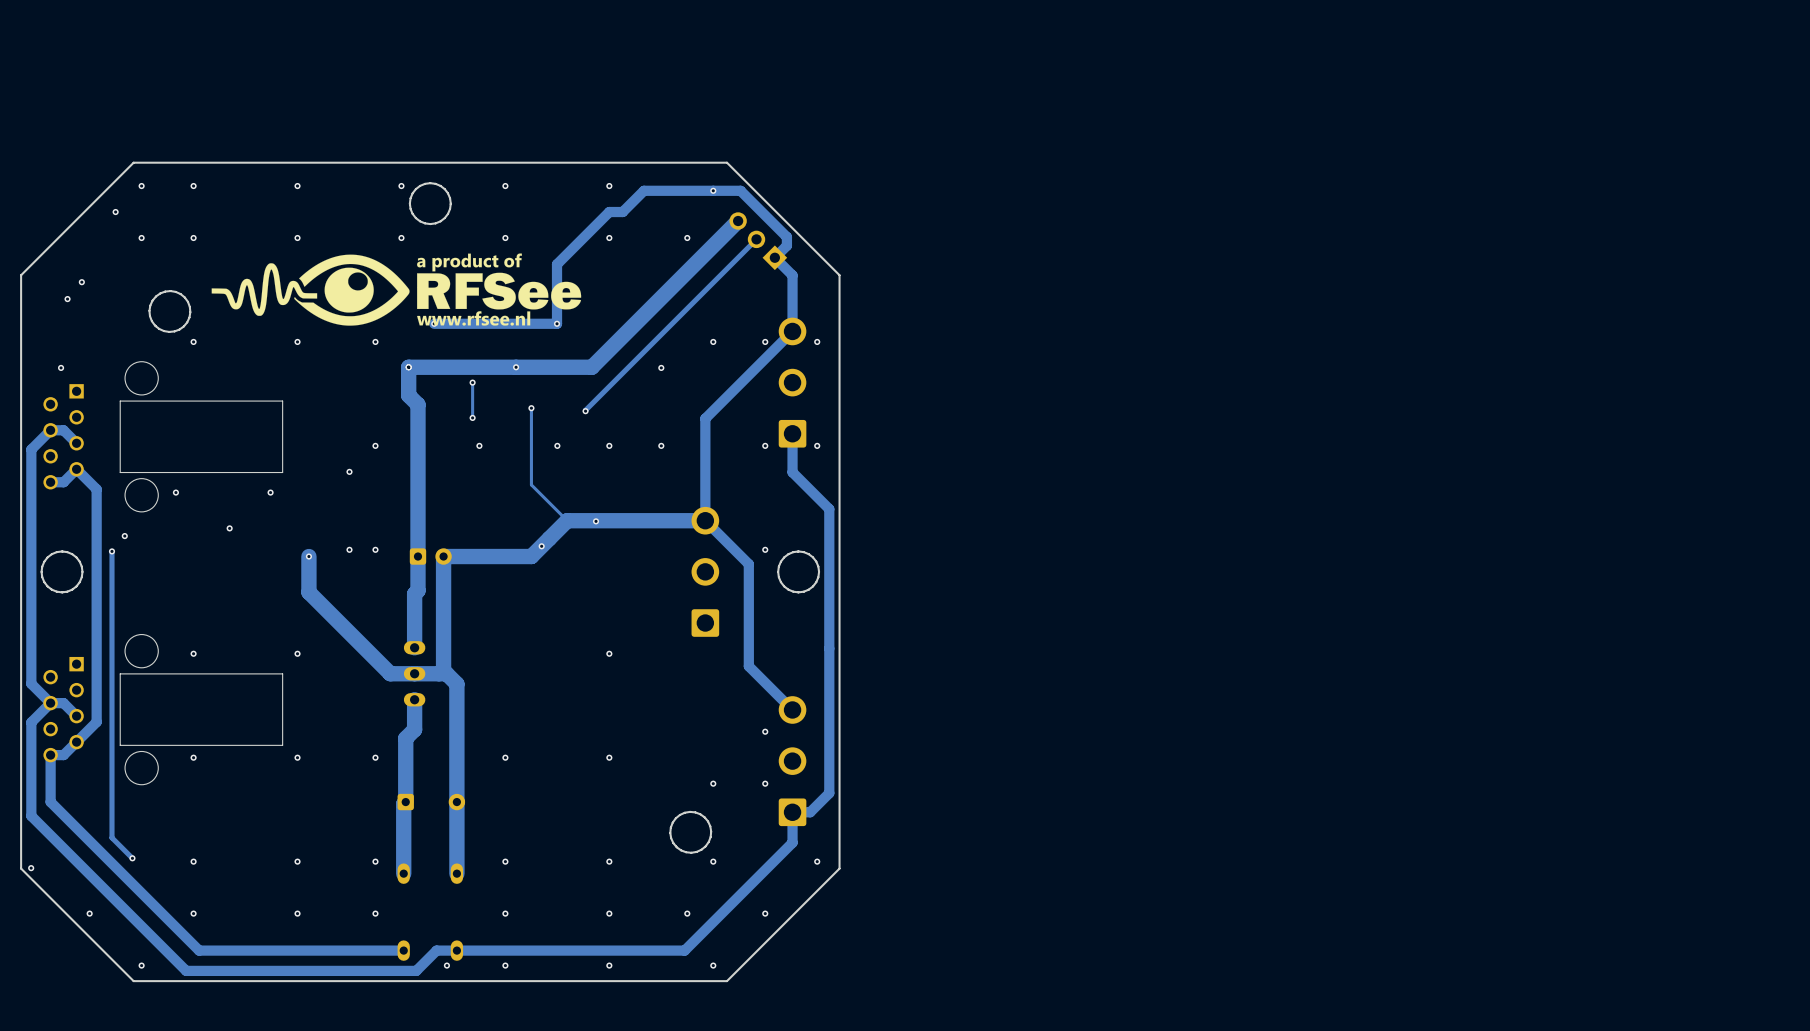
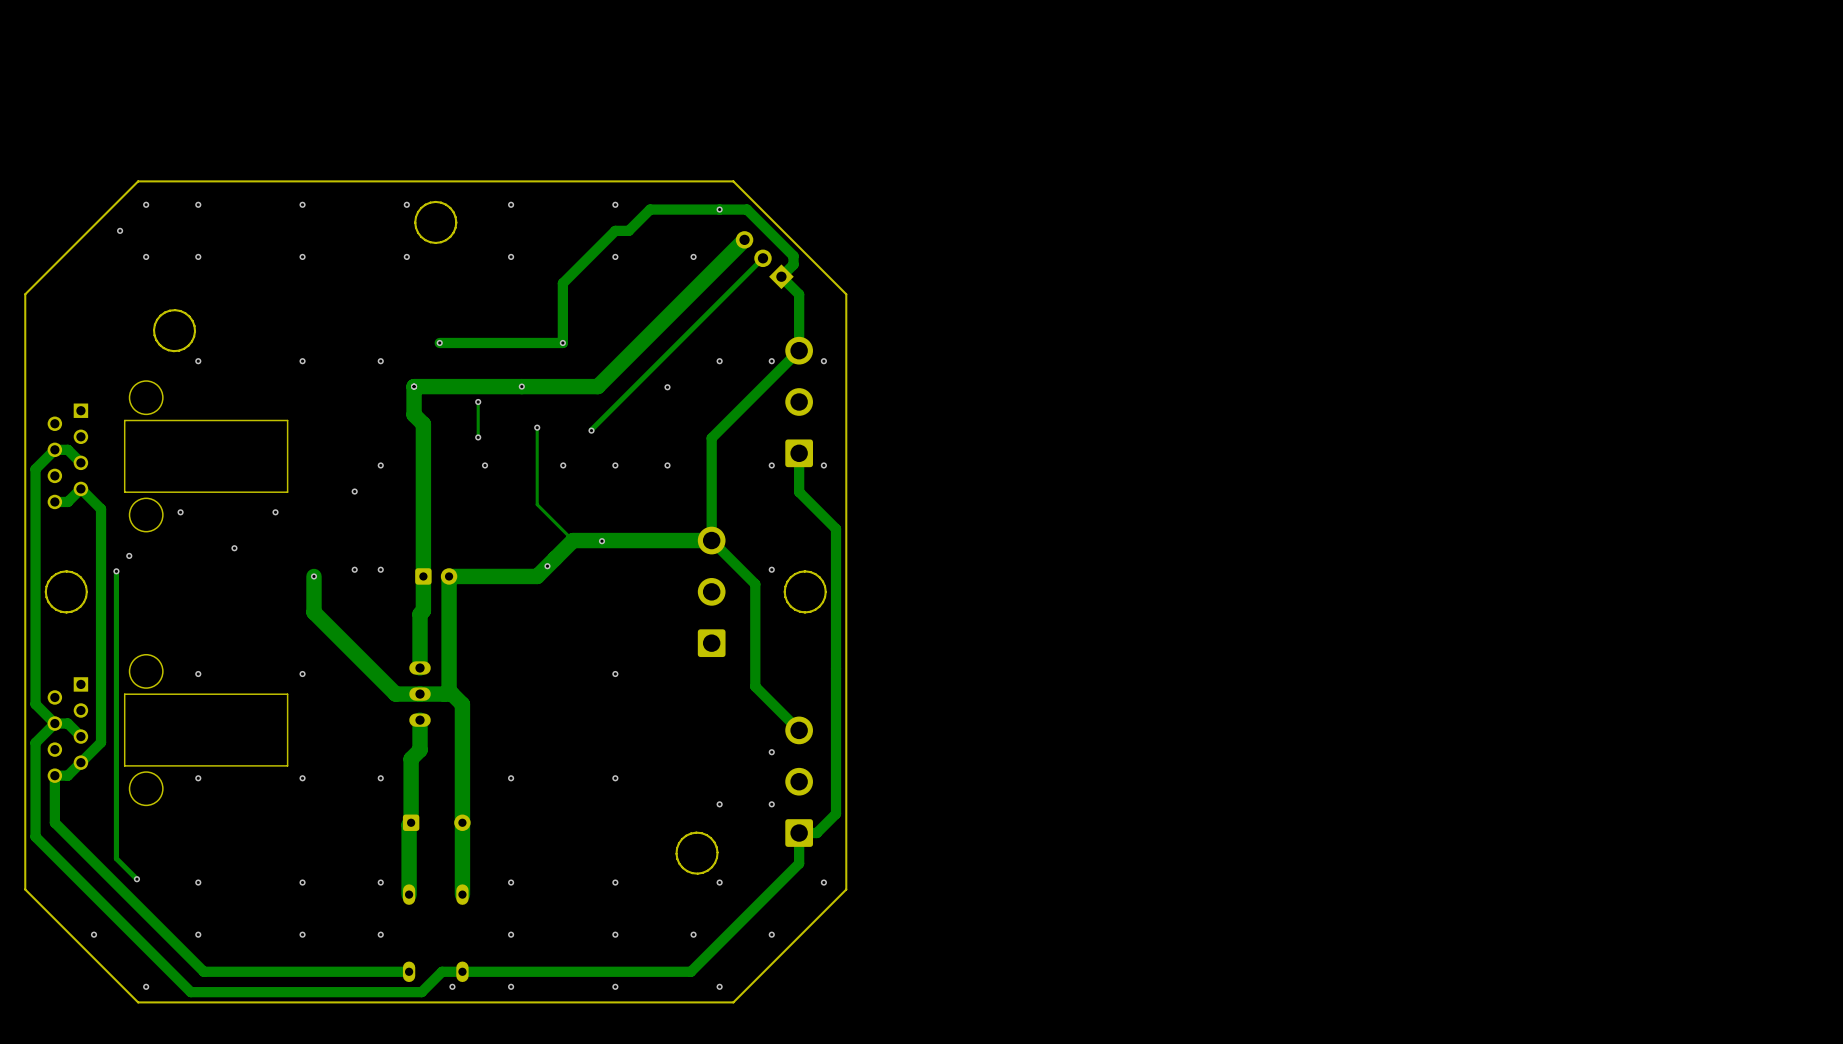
drawing: [211, 253, 582, 326] -> none
via: (81, 282) -> none
via: (67, 299) -> none
via: (61, 367) -> none
via: (31, 868) -> none

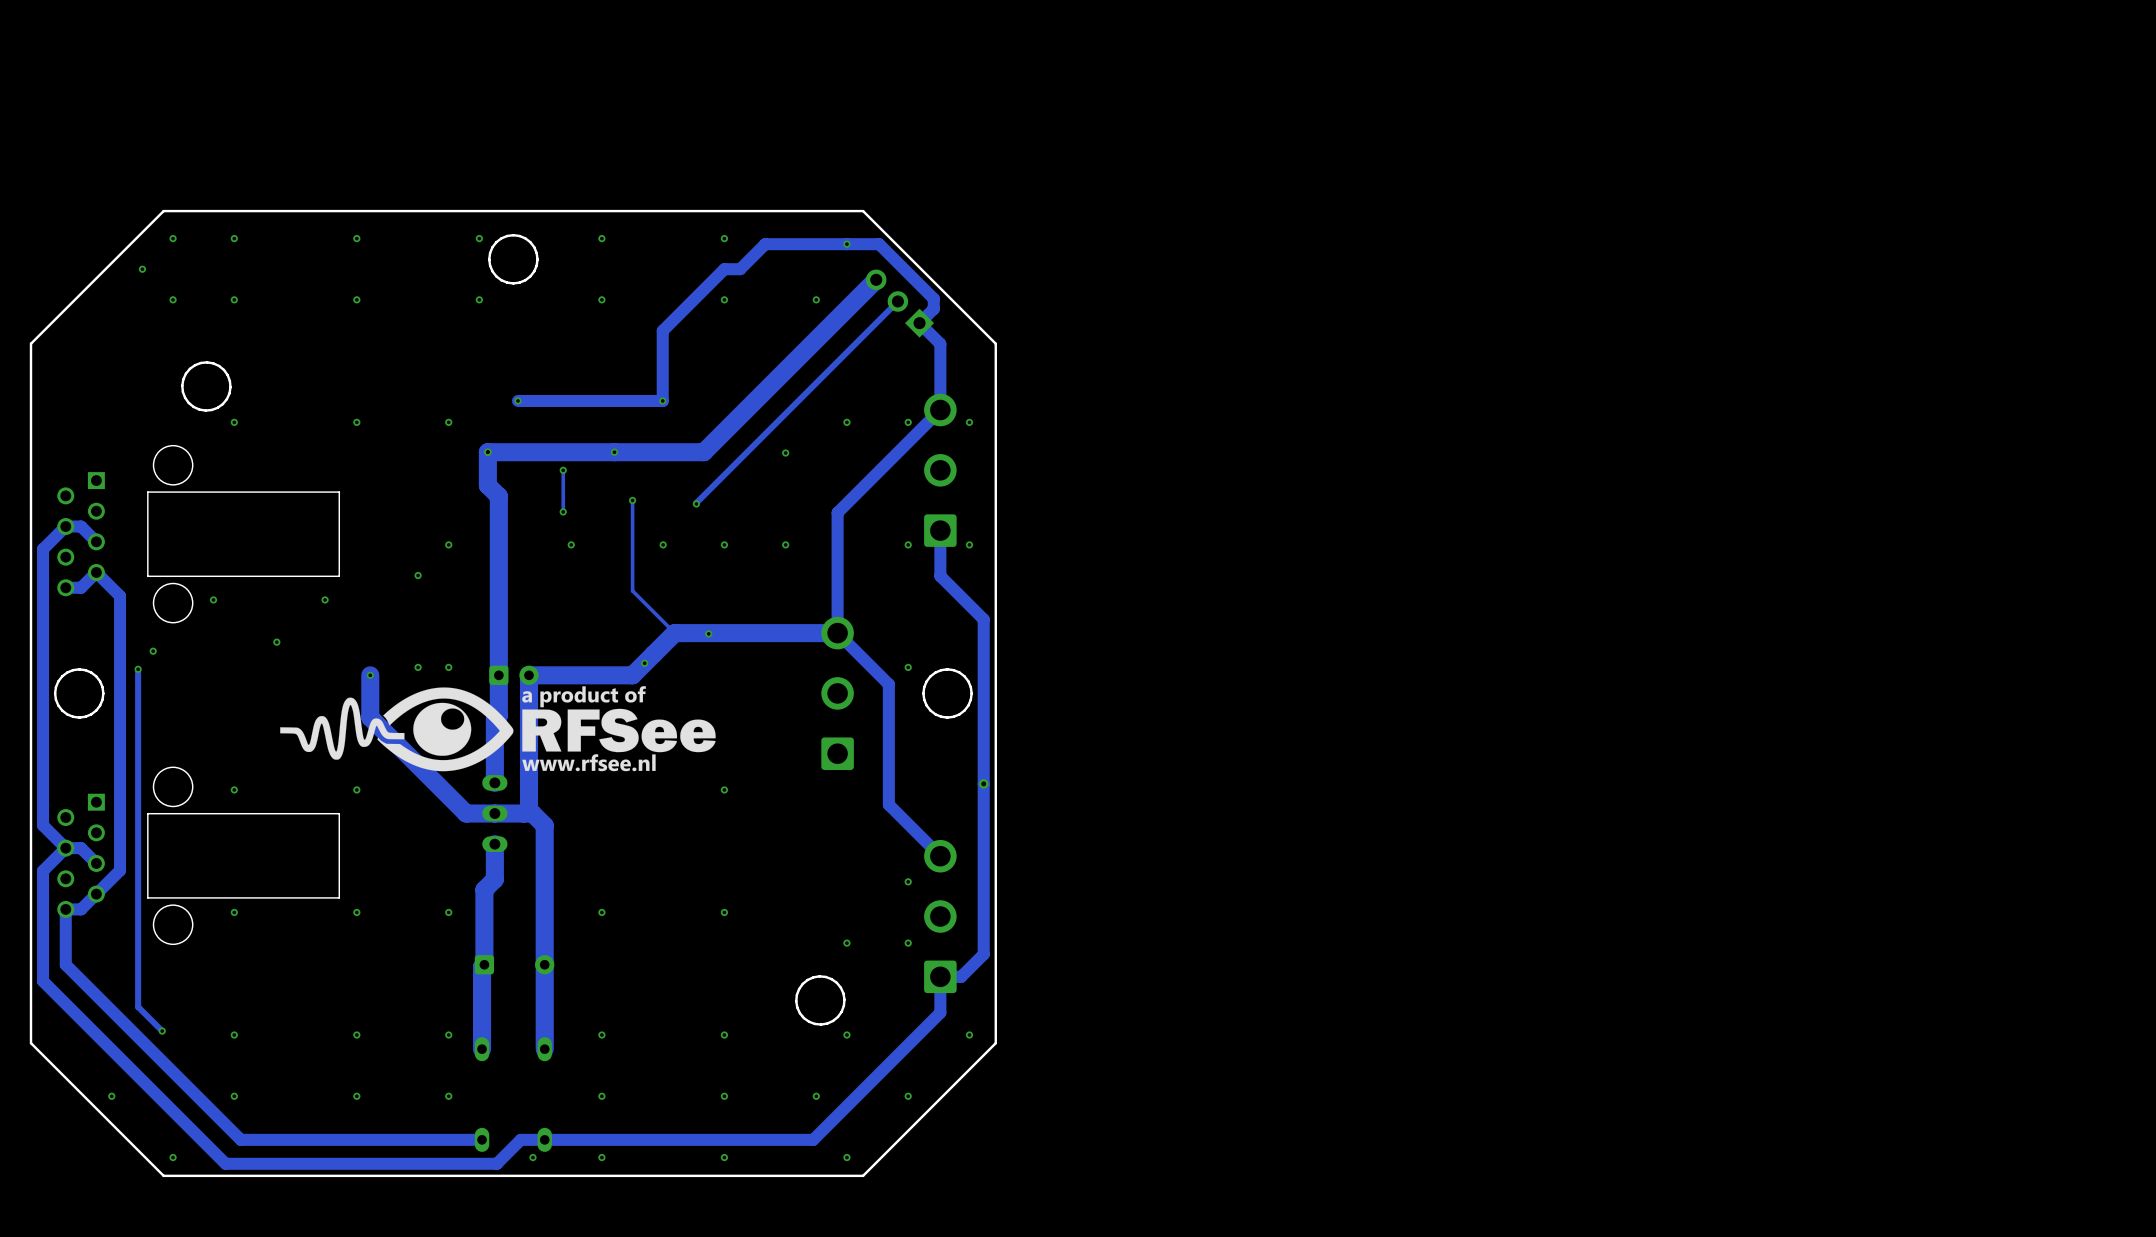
drawing: none -> [280, 686, 716, 772]
via: none -> (983, 783)

